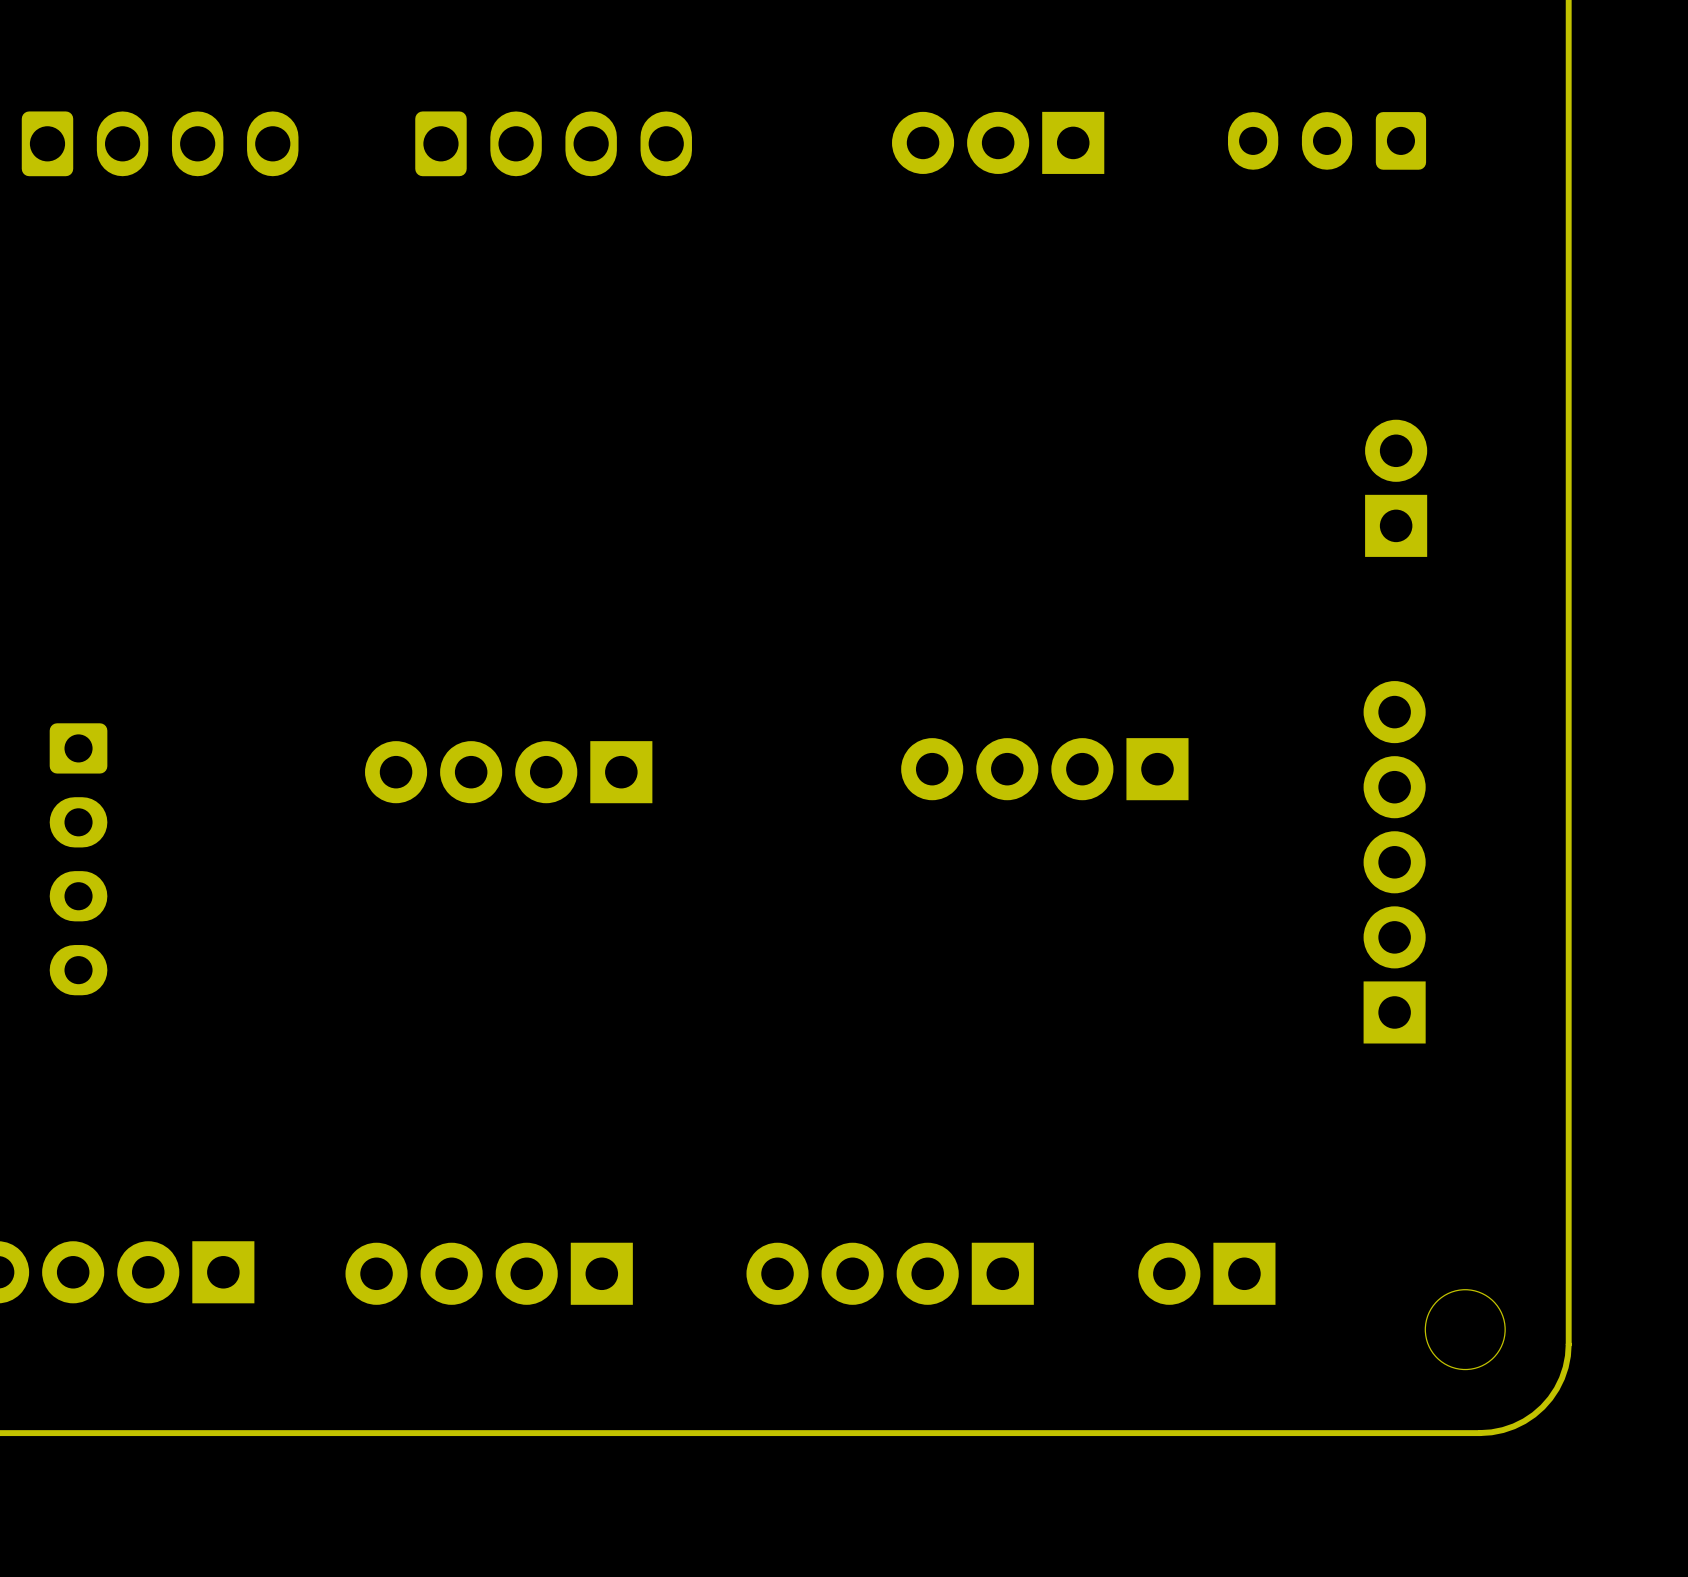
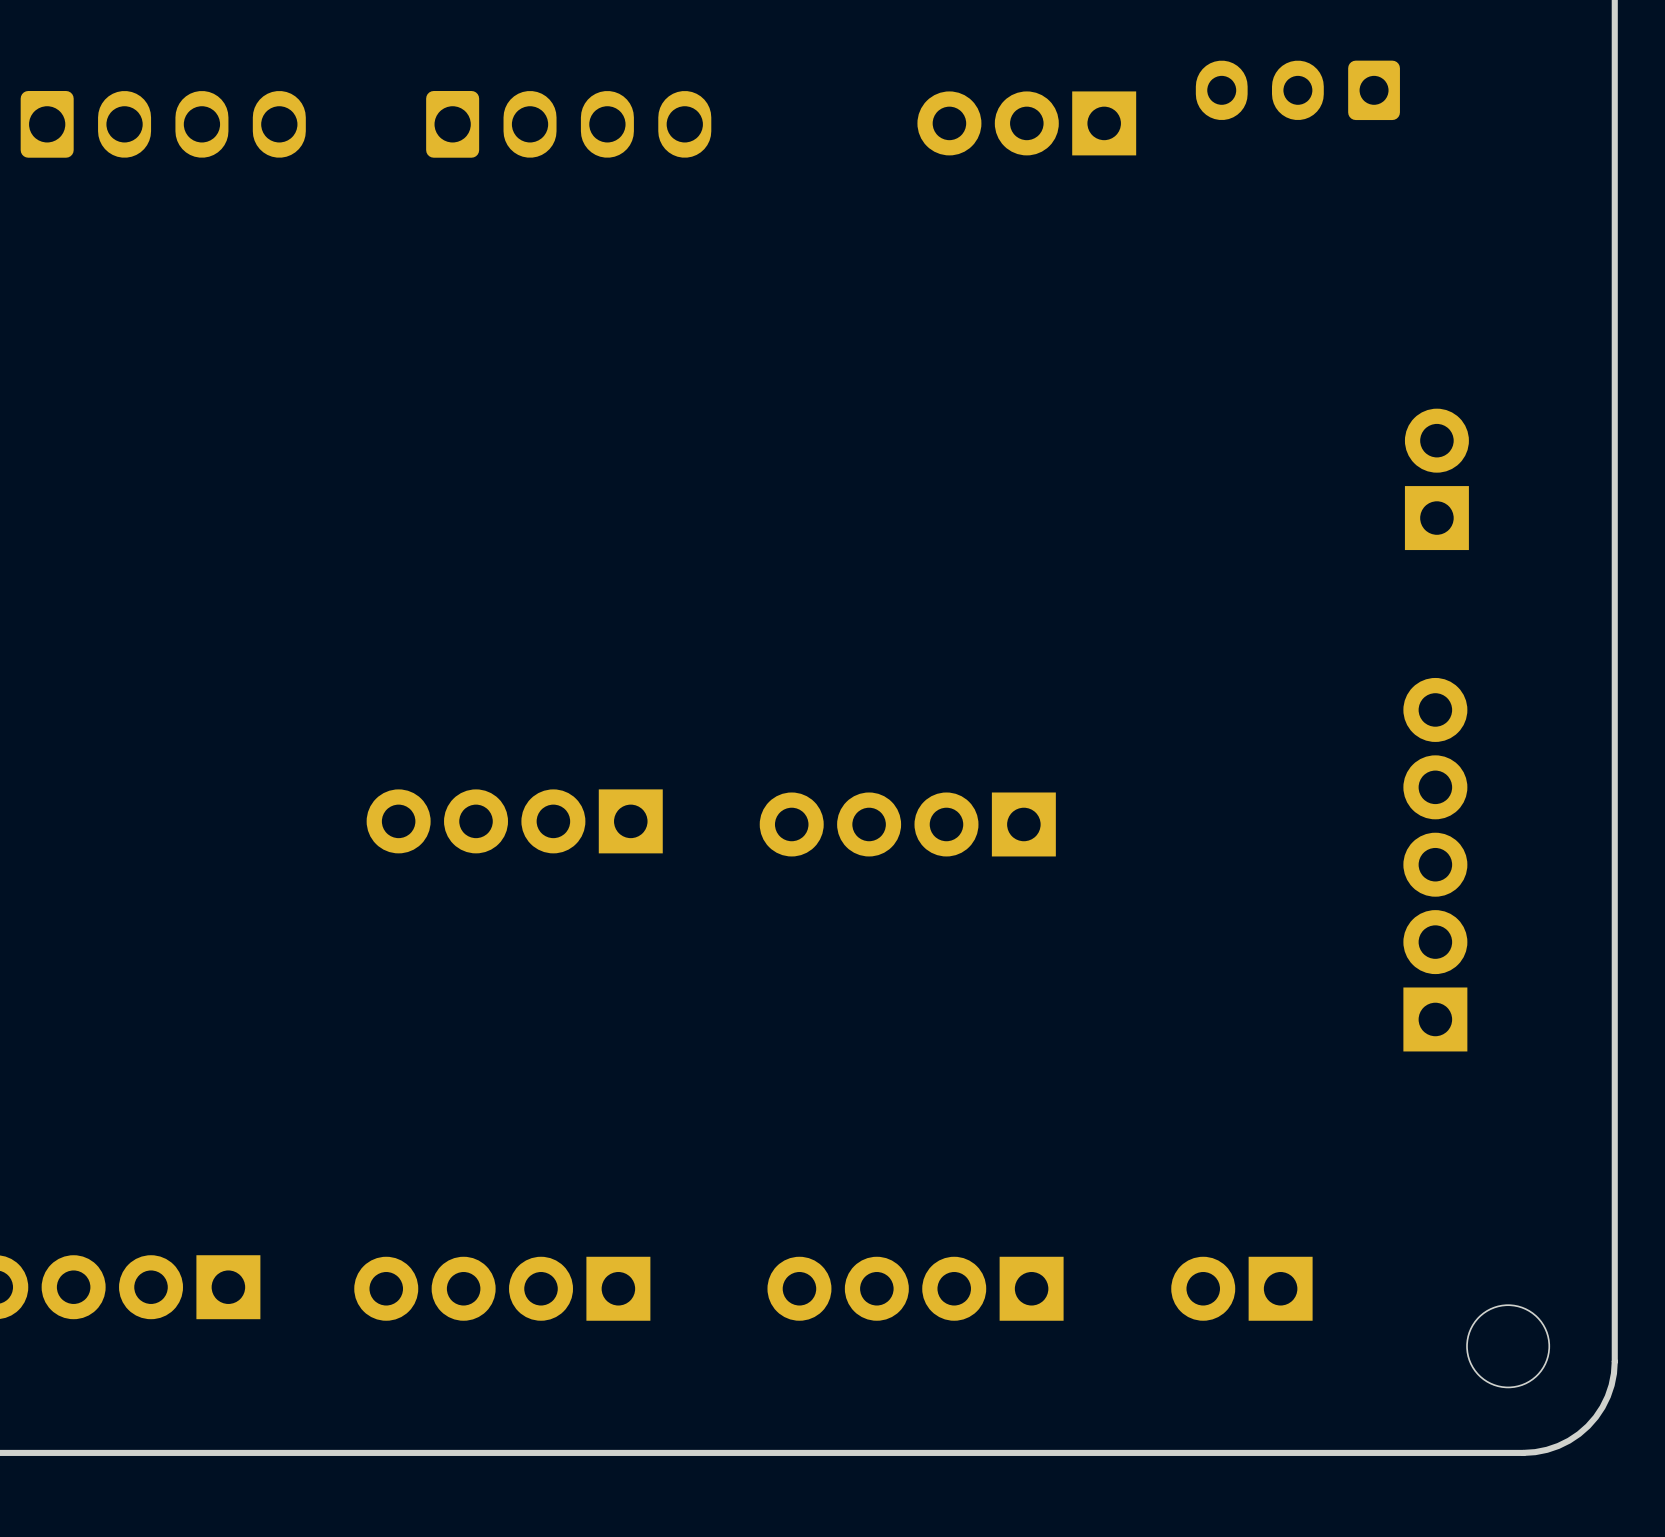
part position: (1327, 140) -> (1297, 90)
part position: (1044, 769) -> (907, 824)
part position: (508, 772) -> (514, 821)
part: (78, 859) -> none

